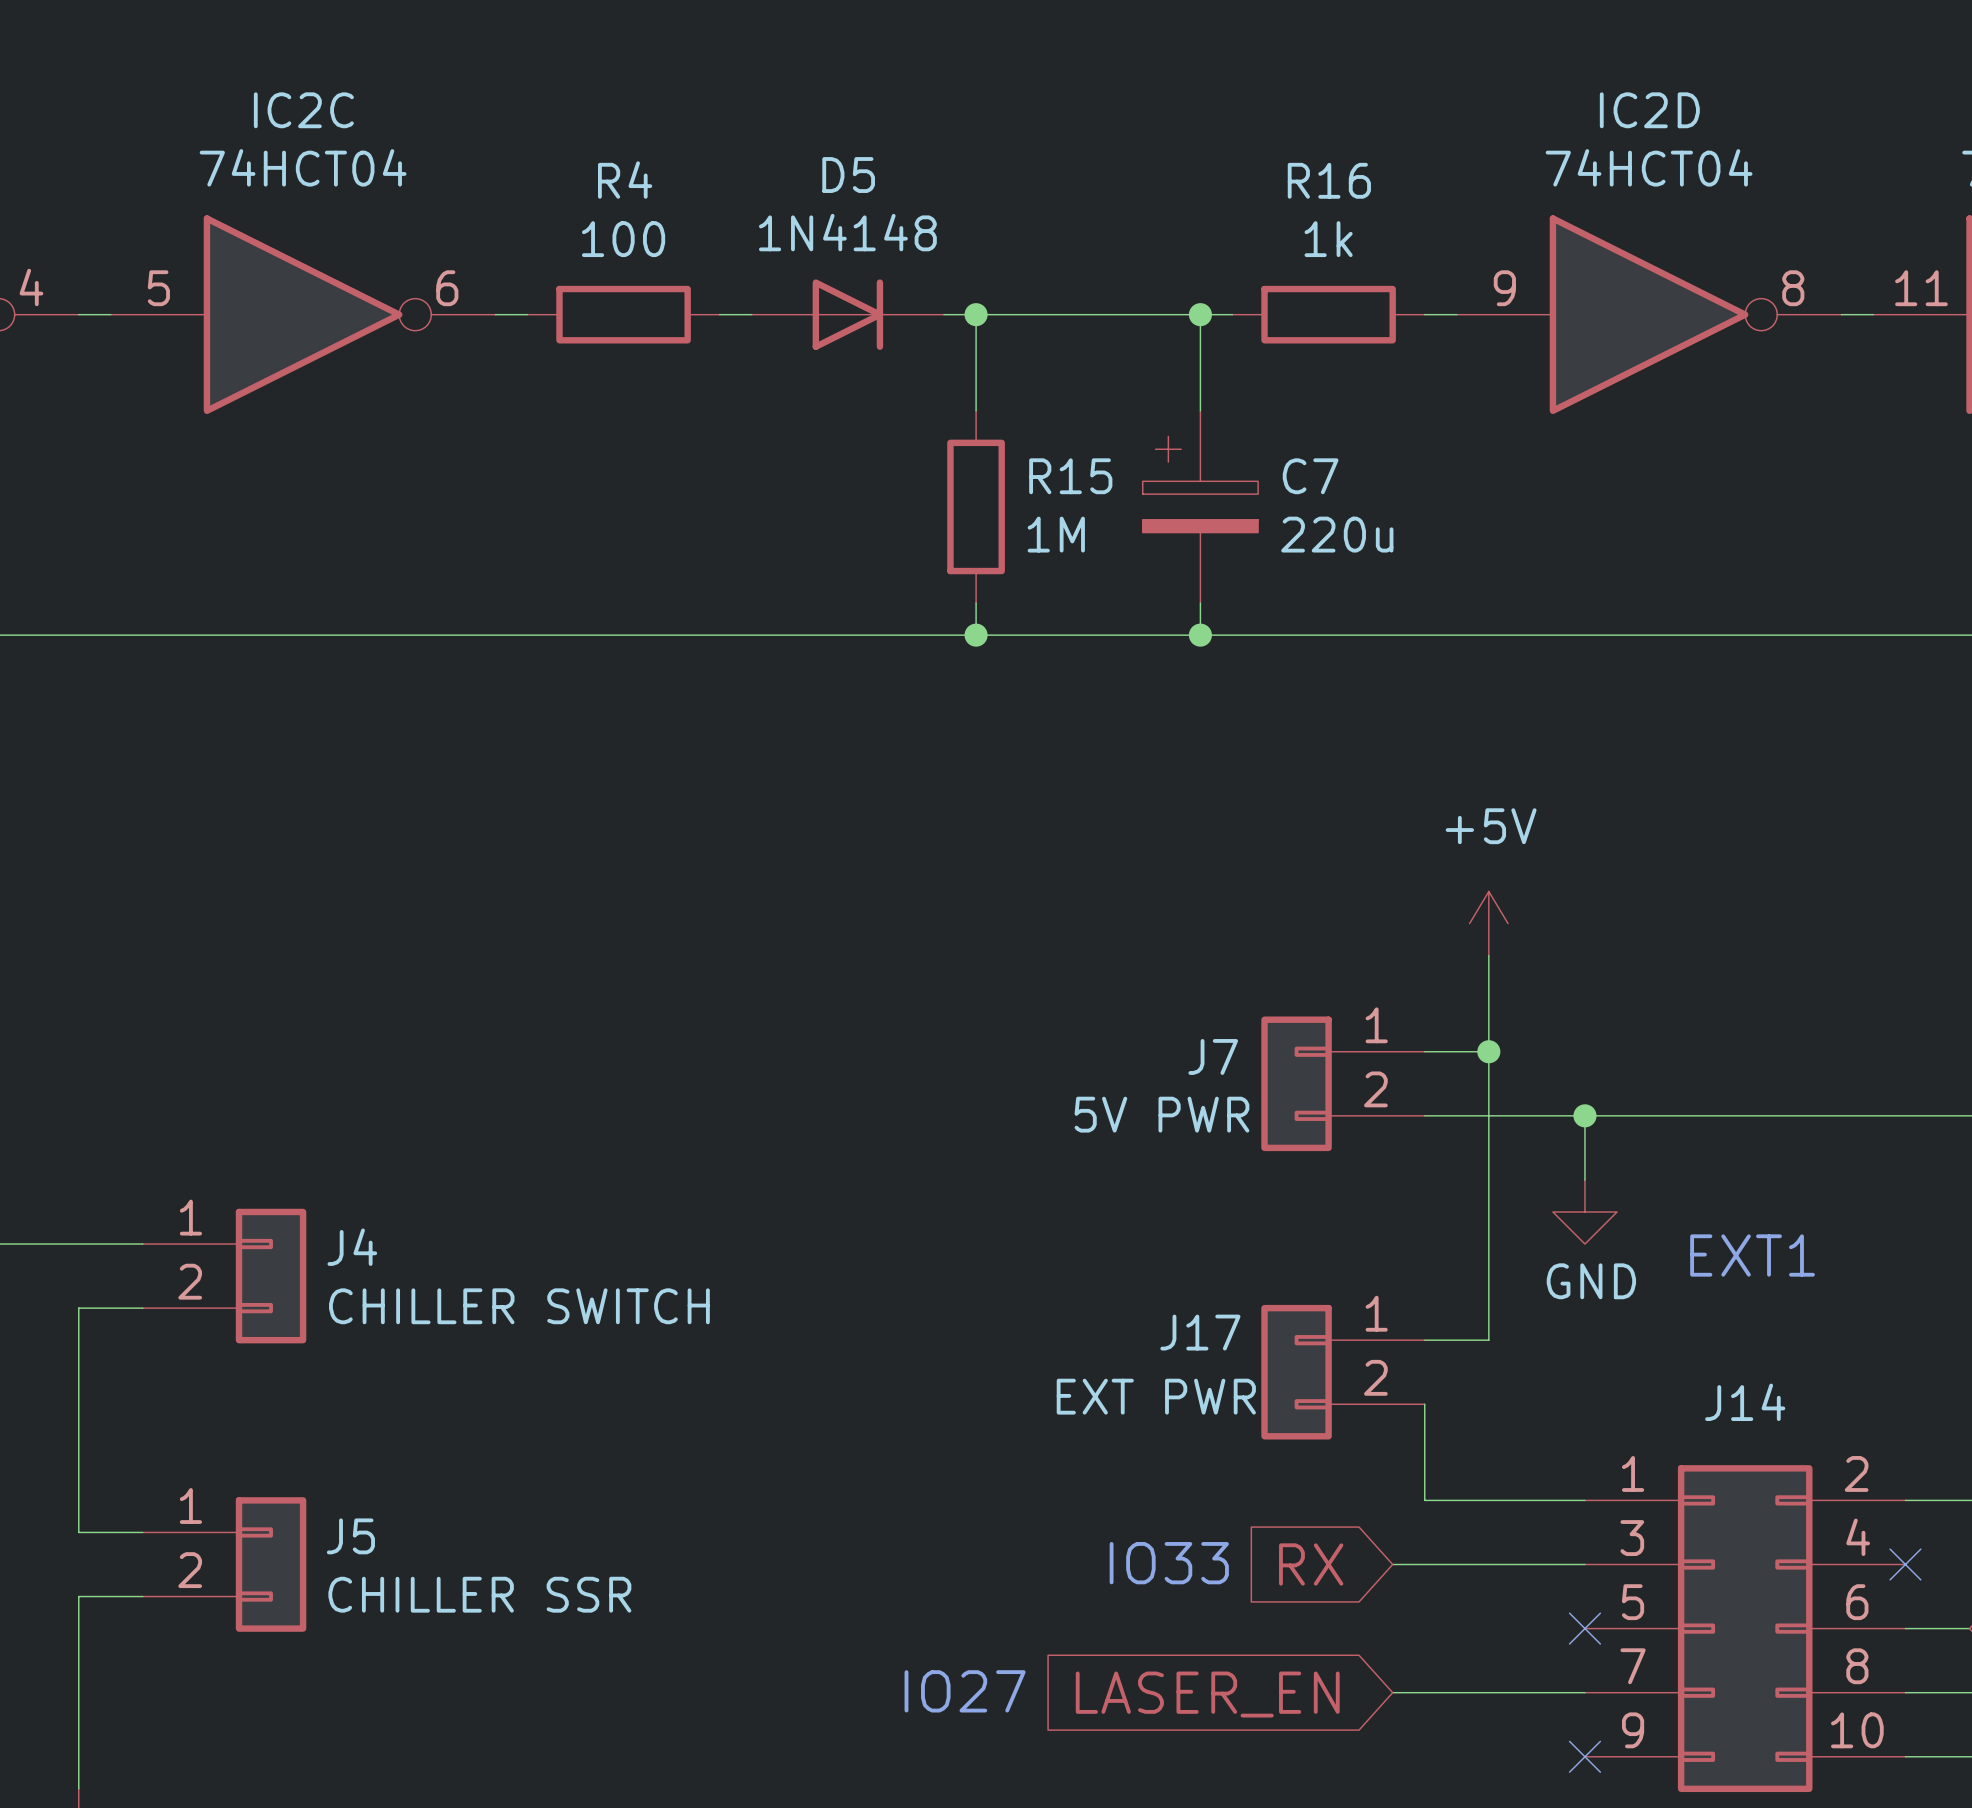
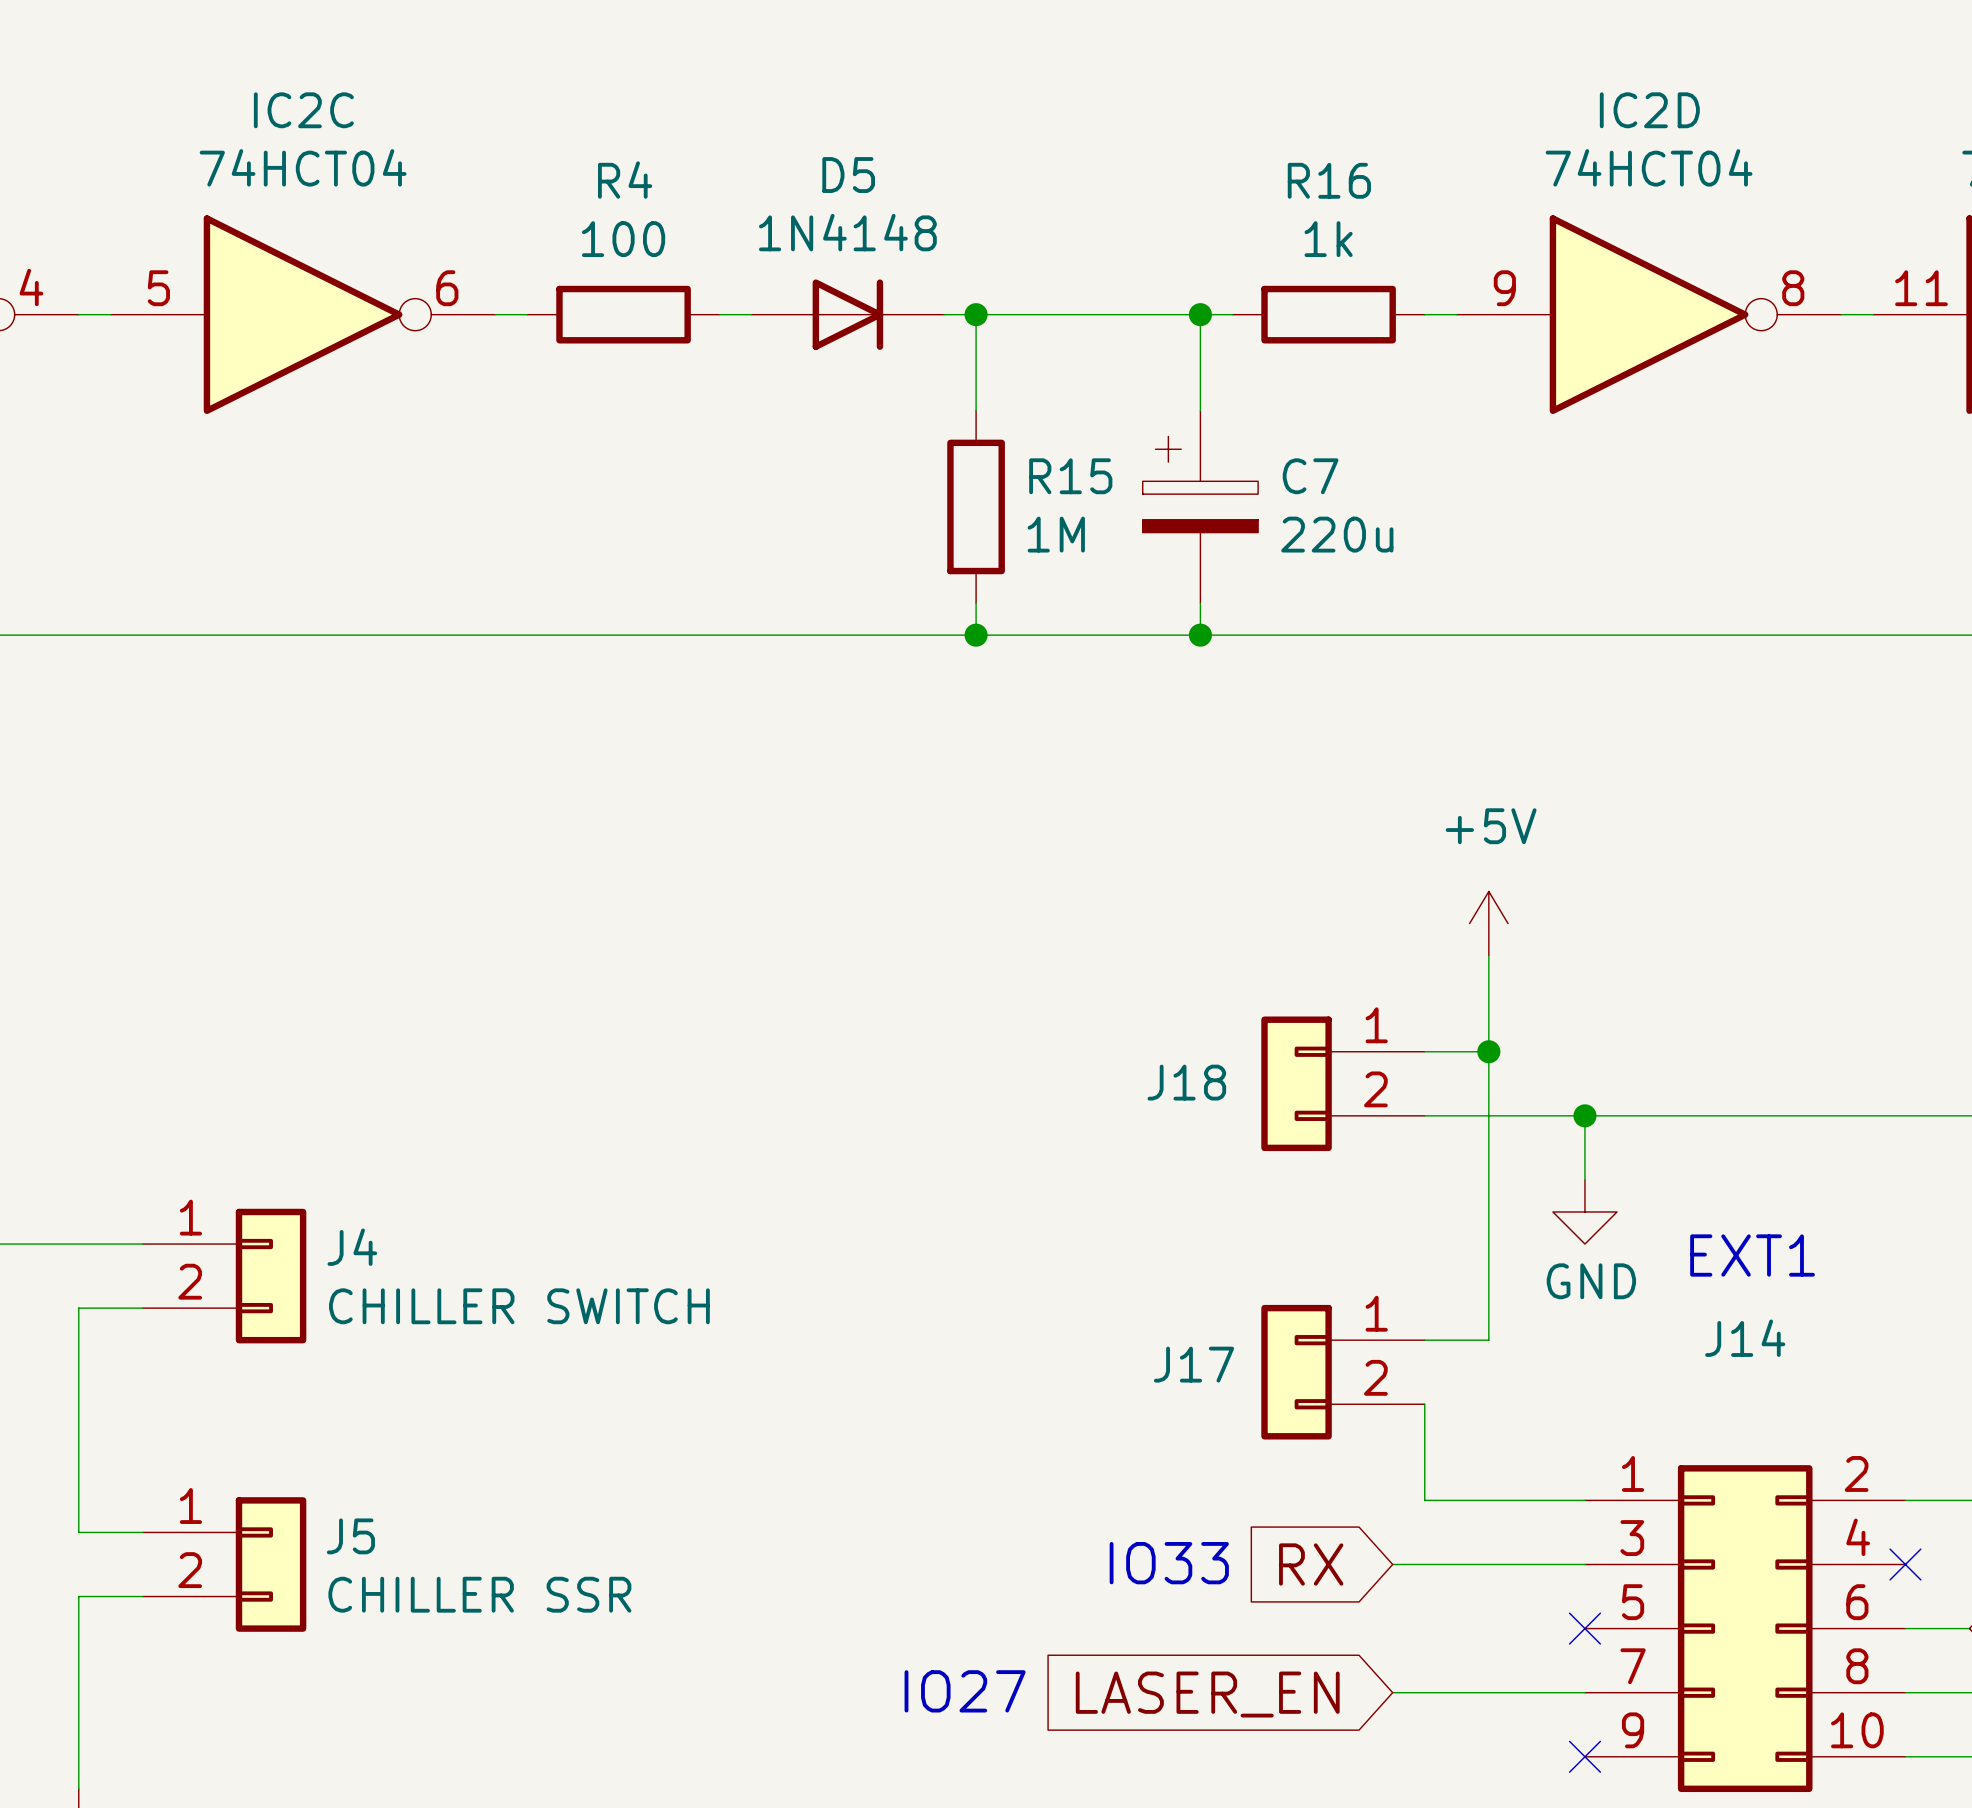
J7 name: J7 (1213, 1056) -> J18 (1186, 1082)
J7 value: 5V PWR (1161, 1114) -> none
J17 name position: J17 (1200, 1332) -> J17 (1194, 1364)
J17 value: EXT PWR (1156, 1396) -> none
J14 name position: J14 (1745, 1402) -> J14 (1745, 1338)

